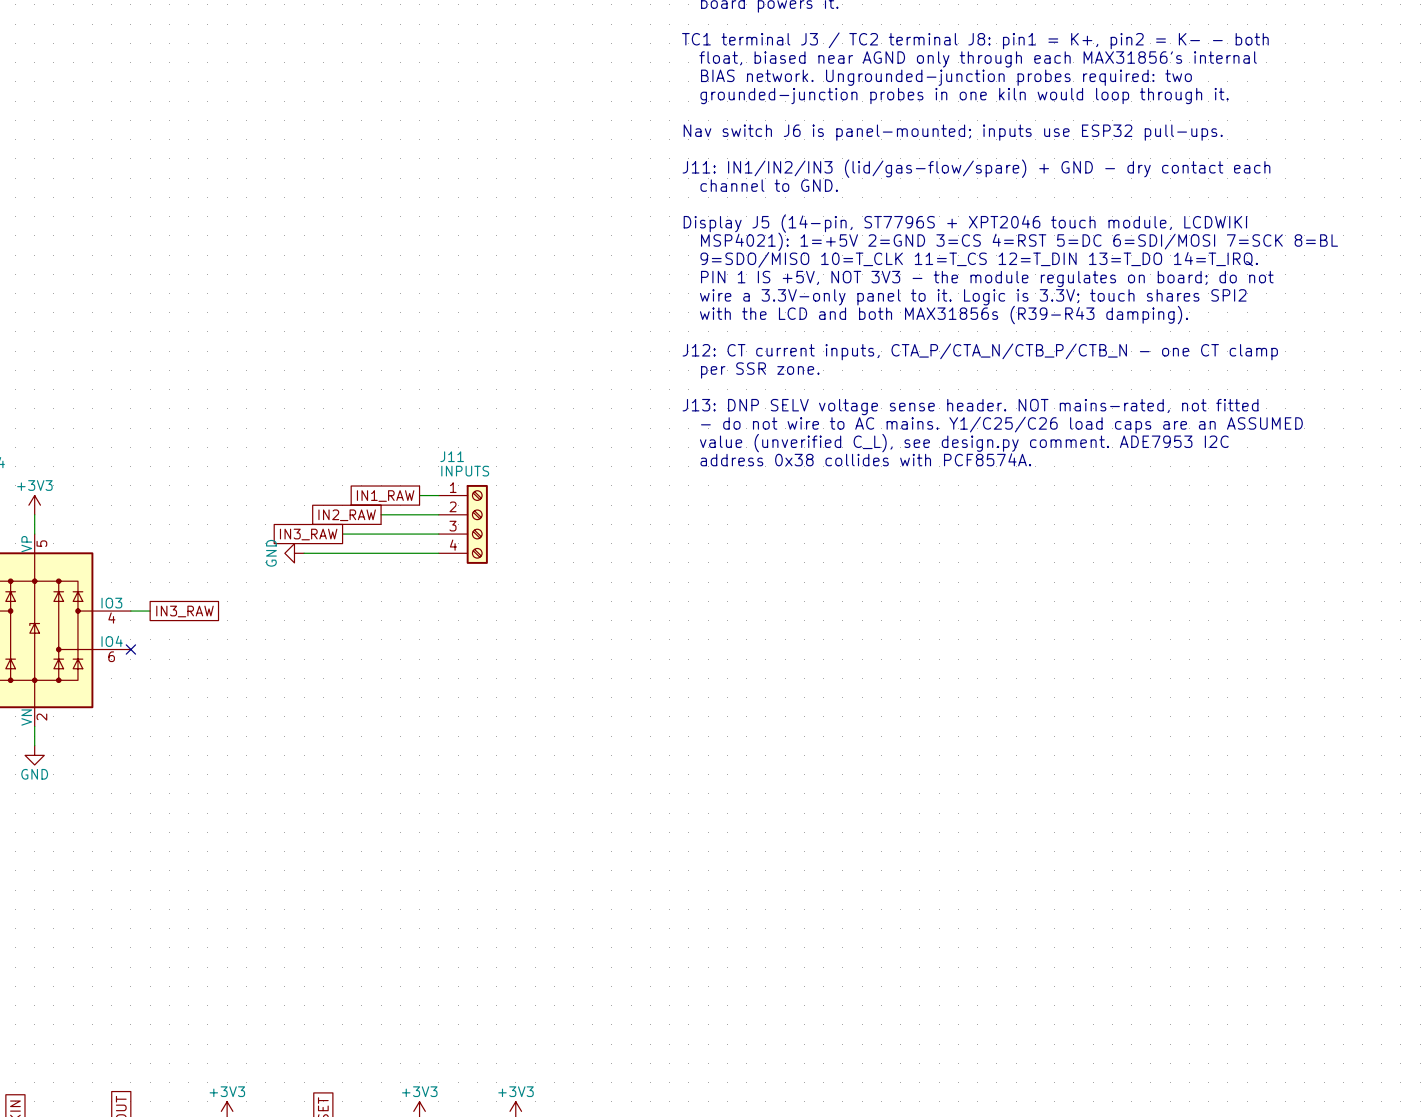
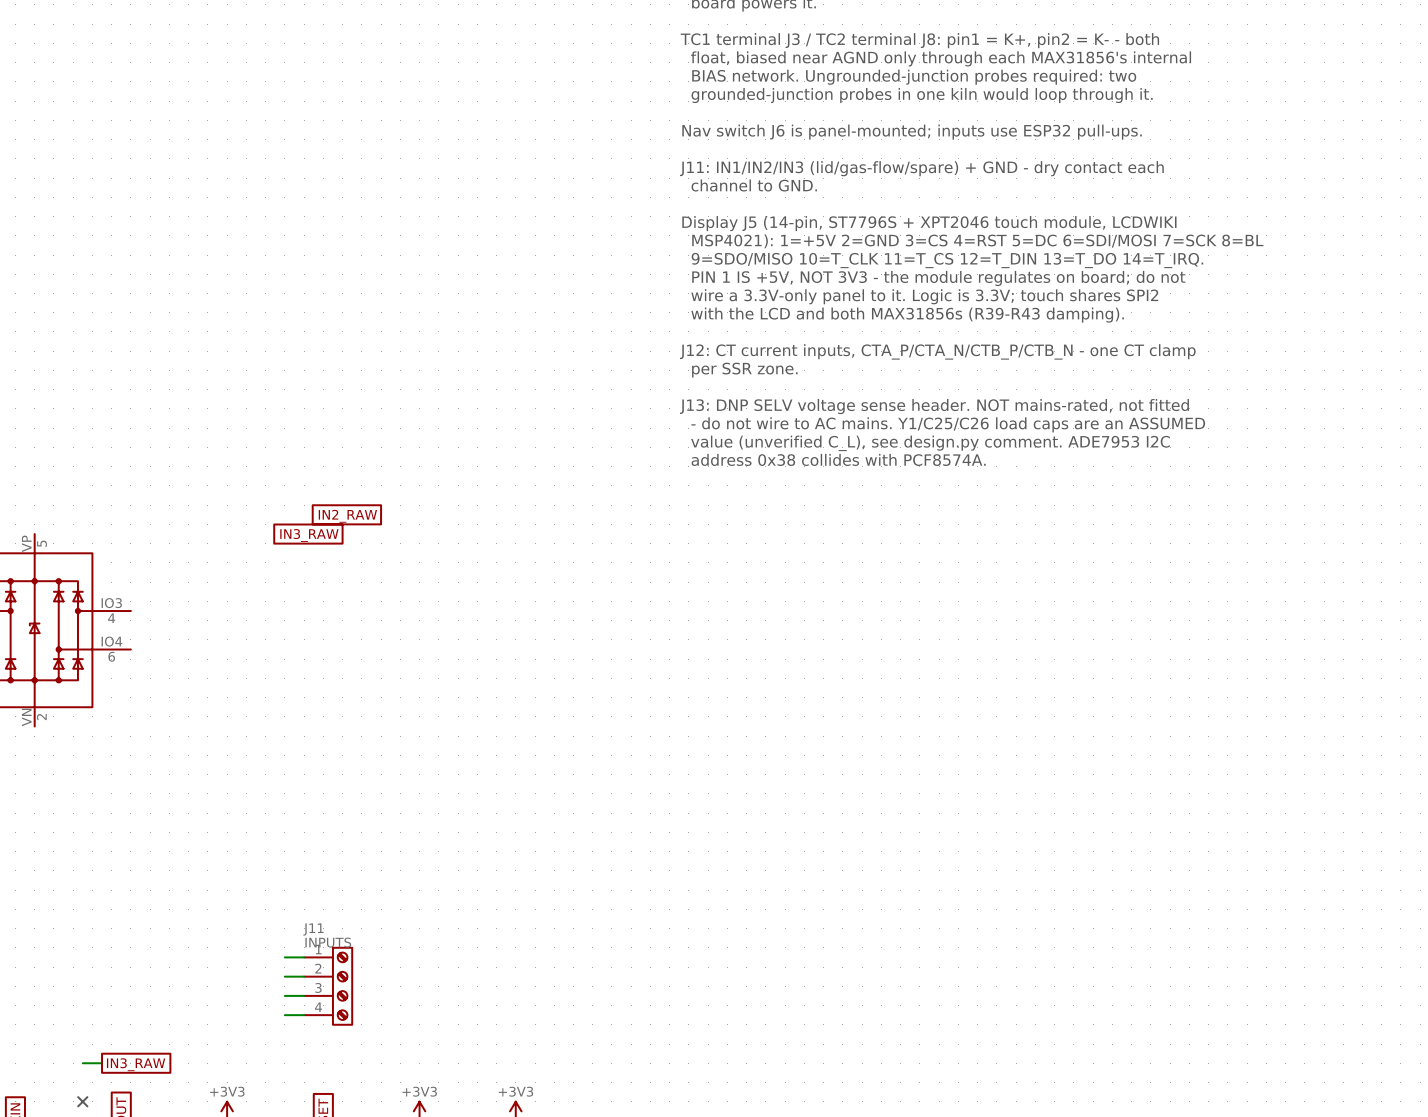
J11 name position: J11 (452, 456) -> J11 (313, 929)
J11 value position: INPUTS (465, 471) -> INPUTS (328, 942)
wire: (419, 495) (438, 495) -> none
global label: IN1_RAW (385, 496) -> none
power symbol: +3V3 (34, 505) -> none
wire: (34, 514) (34, 534) -> none
wire: (381, 514) (438, 514) -> none
J11 position: (463, 524) -> (328, 986)
wire: (342, 534) (438, 534) -> none
power symbol: GND (294, 553) -> none
wire: (304, 553) (438, 553) -> none
wire: (130, 611) (150, 611) -> none
global label: IN3_RAW (184, 611) -> none
no-connect mark: (130, 649) -> none
wire: (34, 726) (34, 745) -> none
power symbol: GND (34, 755) -> none
wire: none -> (284, 957) (304, 957)
wire: none -> (284, 976) (304, 976)
wire: none -> (284, 995) (304, 995)
wire: none -> (284, 1015) (304, 1015)
wire: none -> (82, 1063) (102, 1063)
global label: none -> IN3_RAW (136, 1064)
no-connect mark: none -> (82, 1101)

